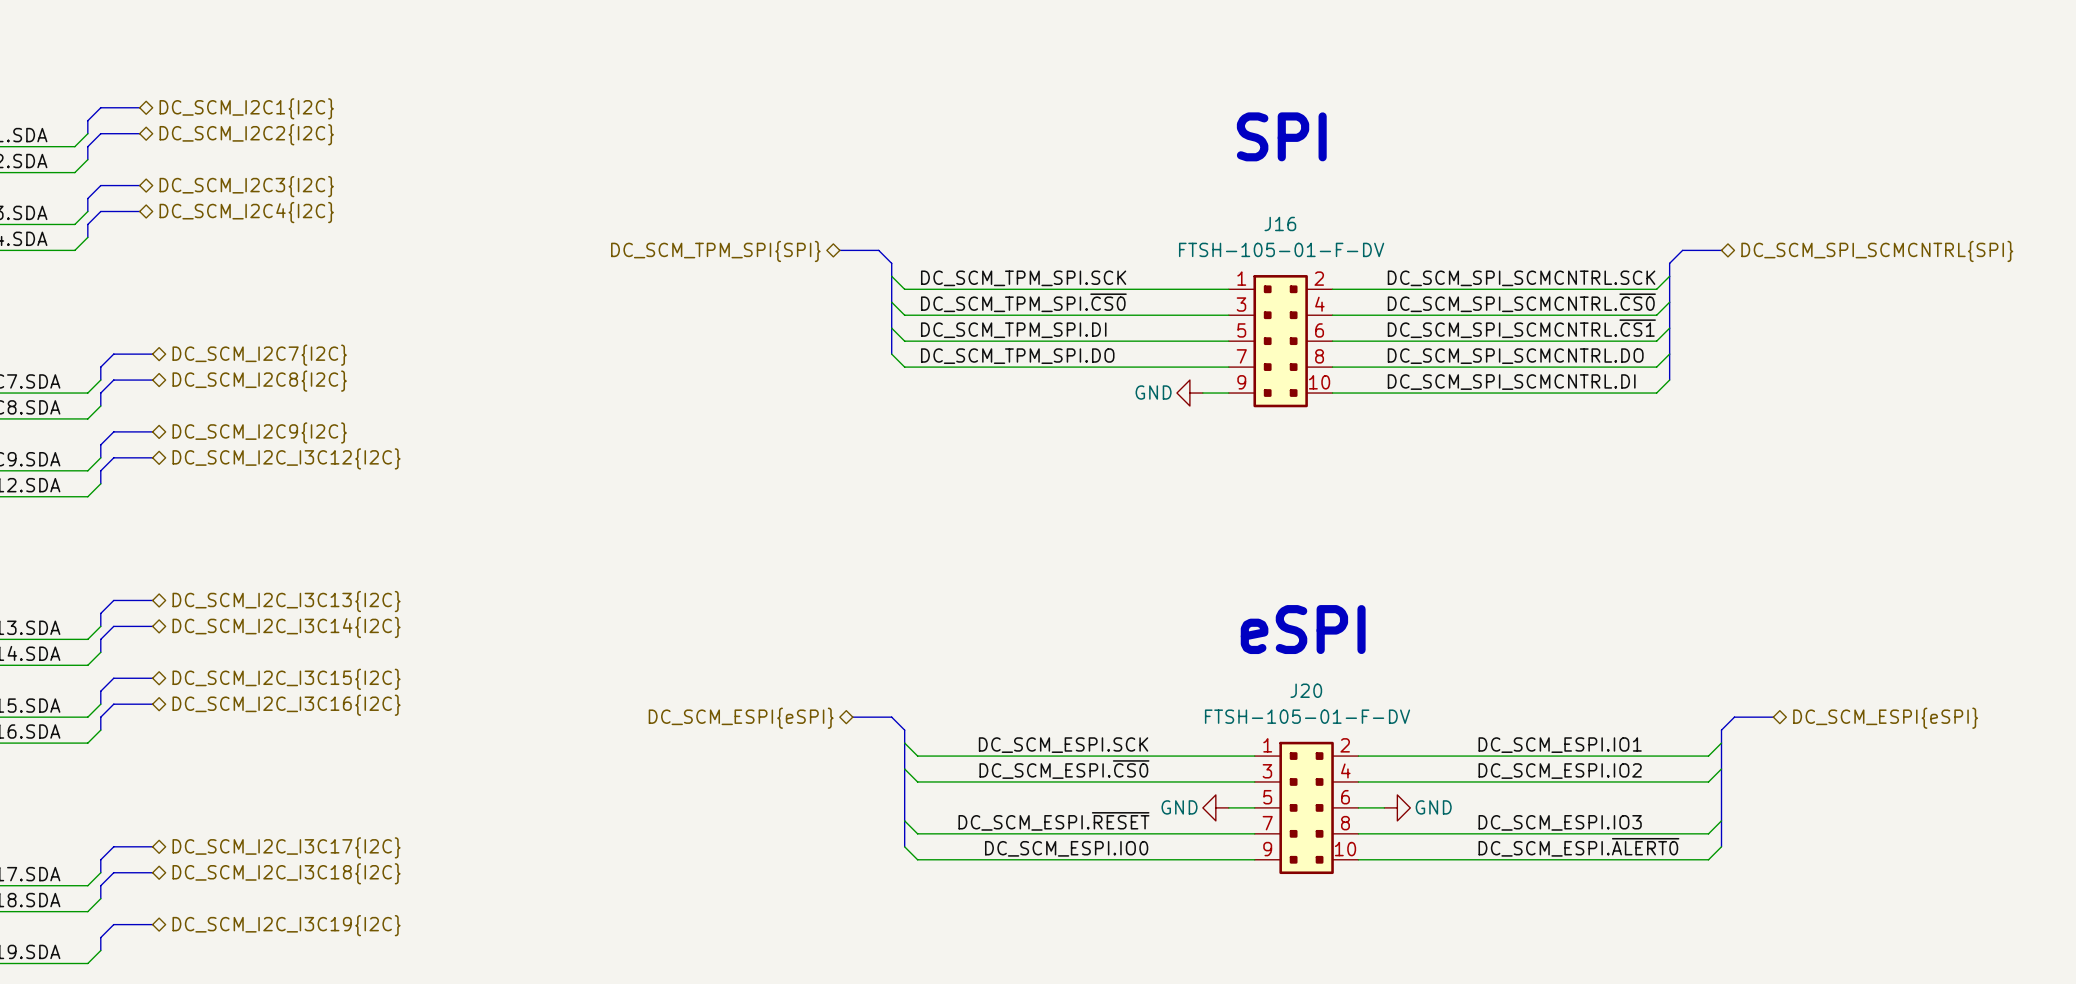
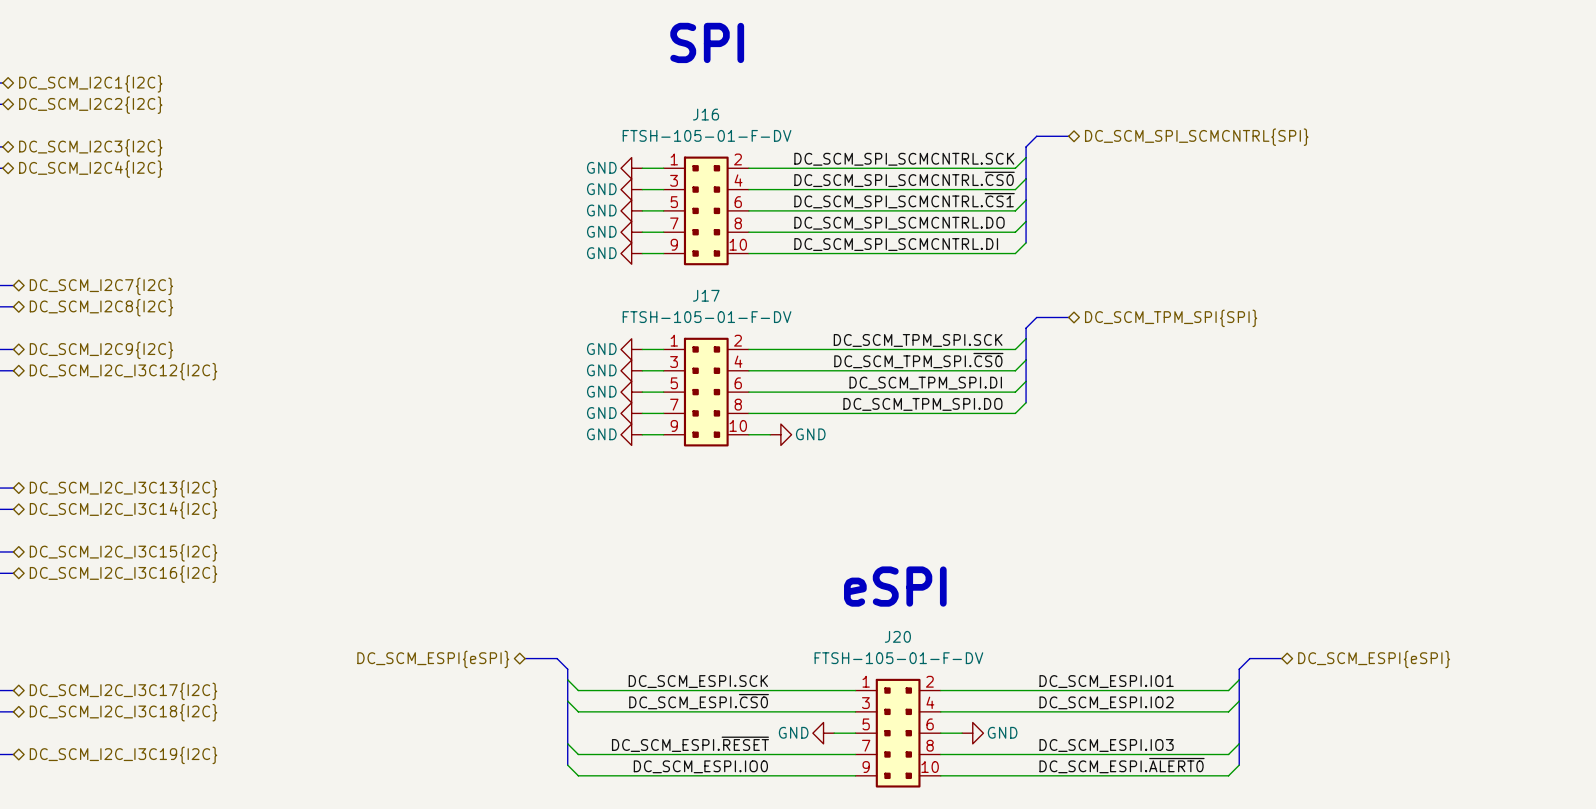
text: none -> SPI (707, 42)
text: SPI (1281, 136) -> none
bus: none -> (1068, 136) (1036, 136) (1026, 146) (1026, 242)
hierarchical label: none -> DC_SCM_SPI_SCMCNTRL{SPI} (1196, 137)
wire: none -> (1026, 157) (1015, 168) (748, 168)
label: none -> DC_SCM_SPI_SCMCNTRL.SCK (904, 159)
power symbol: none -> GND (631, 168)
wire: none -> (642, 168) (663, 168)
label: none -> DC_SCM_SPI_SCMCNTRL.~{CS0} (904, 179)
wire: none -> (1026, 178) (1015, 189) (748, 189)
power symbol: none -> GND (631, 189)
wire: none -> (642, 189) (663, 189)
bus: (839, 250) (878, 250) (891, 263) (891, 354) -> none
label: none -> DC_SCM_SPI_SCMCNTRL.~{CS1} (904, 200)
wire: none -> (1026, 200) (1015, 210) (748, 210)
bus: (1721, 250) (1682, 250) (1669, 263) (1669, 380) -> none
hierarchical label: DC_SCM_TPM_SPI{SPI} (715, 251) -> none
hierarchical label: DC_SCM_SPI_SCMCNTRL{SPI} (1877, 251) -> none
power symbol: none -> GND (631, 210)
wire: none -> (642, 210) (663, 210)
wire: (1669, 276) (1656, 289) (1371, 289) -> (1026, 221) (1015, 232)
label: DC_SCM_TPM_SPI.SCK (1023, 278) -> none
label: none -> DC_SCM_SPI_SCMCNTRL.DO (899, 223)
label: DC_SCM_SPI_SCMCNTRL.SCK (1521, 278) -> none
power symbol: none -> GND (631, 232)
label: DC_SCM_TPM_SPI.~{CS0} (1023, 302) -> none
label: DC_SCM_SPI_SCMCNTRL.~{CS0} (1521, 302) -> none
wire: (1669, 302) (1656, 315) (1371, 315) -> (1026, 242) (1015, 253)
label: none -> DC_SCM_SPI_SCMCNTRL.DI (896, 244)
power symbol: none -> GND (631, 253)
wire: (891, 328) (904, 341) (1228, 341) -> none
label: DC_SCM_SPI_SCMCNTRL.~{CS1} (1521, 328) -> none
wire: (1669, 328) (1656, 341) (1332, 341) -> none
label: DC_SCM_TPM_SPI.DI (1013, 330) -> none
J16 position: (1280, 341) -> (706, 210)
wire: (891, 354) (904, 367) (1228, 367) -> none
wire: (1669, 354) (1656, 367) (1332, 367) -> none
label: DC_SCM_TPM_SPI.DO (1017, 356) -> none
label: DC_SCM_SPI_SCMCNTRL.DO (1515, 356) -> none
wire: (1669, 380) (1656, 393) (1332, 393) -> none
label: DC_SCM_SPI_SCMCNTRL.DI (1511, 382) -> none
power symbol: GND (1189, 393) -> none
wire: (1202, 393) (1228, 393) -> (748, 434) (770, 434)
bus: none -> (1068, 317) (1036, 317) (1026, 328) (1026, 402)
hierarchical label: none -> DC_SCM_TPM_SPI{SPI} (1171, 318)
wire: none -> (1026, 338) (1015, 349) (748, 349)
label: none -> DC_SCM_TPM_SPI.SCK (918, 340)
power symbol: none -> GND (631, 349)
wire: none -> (642, 349) (663, 349)
wire: none -> (1026, 360) (1015, 370) (748, 370)
label: none -> DC_SCM_TPM_SPI.~{CS0} (918, 360)
power symbol: none -> GND (631, 370)
wire: none -> (642, 370) (663, 370)
wire: none -> (1026, 381) (1015, 392) (748, 392)
label: none -> DC_SCM_TPM_SPI.DI (925, 383)
power symbol: none -> GND (631, 392)
wire: none -> (642, 392) (663, 392)
J17: none -> (706, 392)
wire: none -> (1026, 402) (1015, 413) (748, 413)
label: none -> DC_SCM_TPM_SPI.DO (922, 404)
power symbol: none -> GND (631, 413)
wire: none -> (642, 413) (663, 413)
power symbol: none -> GND (631, 434)
wire: none -> (642, 434) (663, 434)
power symbol: none -> GND (780, 434)
text position: eSPI (1303, 629) -> eSPI (895, 586)
bus: (852, 717) (891, 717) (904, 730) (904, 846) -> (525, 658) (557, 658) (567, 669) (567, 765)
bus: (1773, 717) (1734, 717) (1721, 730) (1721, 846) -> (1281, 658) (1249, 658) (1239, 669) (1239, 765)
hierarchical label position: DC_SCM_ESPI{eSPI} (741, 718) -> DC_SCM_ESPI{eSPI} (433, 659)
hierarchical label position: DC_SCM_ESPI{eSPI} (1885, 718) -> DC_SCM_ESPI{eSPI} (1374, 659)
wire: (904, 743) (917, 756) (1254, 756) -> (567, 679) (578, 690) (855, 690)
wire: (1721, 743) (1708, 756) (1358, 756) -> (1239, 679) (1228, 690) (940, 690)
label position: DC_SCM_ESPI.SCK (1063, 745) -> DC_SCM_ESPI.SCK (698, 681)
label position: DC_SCM_ESPI.IO1 (1560, 745) -> DC_SCM_ESPI.IO1 (1106, 681)
wire: (904, 769) (917, 781) (1254, 781) -> (567, 701) (578, 711) (855, 711)
label position: DC_SCM_ESPI.~{CS0} (1064, 769) -> DC_SCM_ESPI.~{CS0} (699, 701)
wire: (1721, 769) (1708, 781) (1358, 781) -> (1239, 701) (1228, 711) (940, 711)
label position: DC_SCM_ESPI.IO2 (1560, 771) -> DC_SCM_ESPI.IO2 (1106, 702)
power symbol: GND (1215, 807) -> none
wire: (1228, 807) (1254, 807) -> (834, 733) (855, 733)
J20 position: (1306, 807) -> (898, 733)
wire: (1358, 807) (1384, 807) -> (940, 733) (962, 733)
power symbol: GND (1397, 807) -> none
wire: (904, 820) (917, 833) (1254, 833) -> (567, 743) (578, 754) (855, 754)
wire: (1721, 820) (1708, 833) (1358, 833) -> (1239, 743) (1228, 754) (940, 754)
label position: DC_SCM_ESPI.~{RESET} (1053, 821) -> DC_SCM_ESPI.~{RESET} (690, 744)
label position: DC_SCM_ESPI.IO3 (1560, 822) -> DC_SCM_ESPI.IO3 (1106, 745)
wire: (904, 846) (917, 859) (1254, 859) -> (567, 765) (578, 775) (855, 775)
wire: (1721, 846) (1708, 859) (1358, 859) -> (1239, 765) (1228, 775) (940, 775)
label position: DC_SCM_ESPI.~{ALERT0} (1578, 847) -> DC_SCM_ESPI.~{ALERT0} (1122, 765)
label position: DC_SCM_ESPI.IO0 (1066, 848) -> DC_SCM_ESPI.IO0 (700, 766)
power symbol: none -> GND (823, 733)
power symbol: none -> GND (972, 733)

